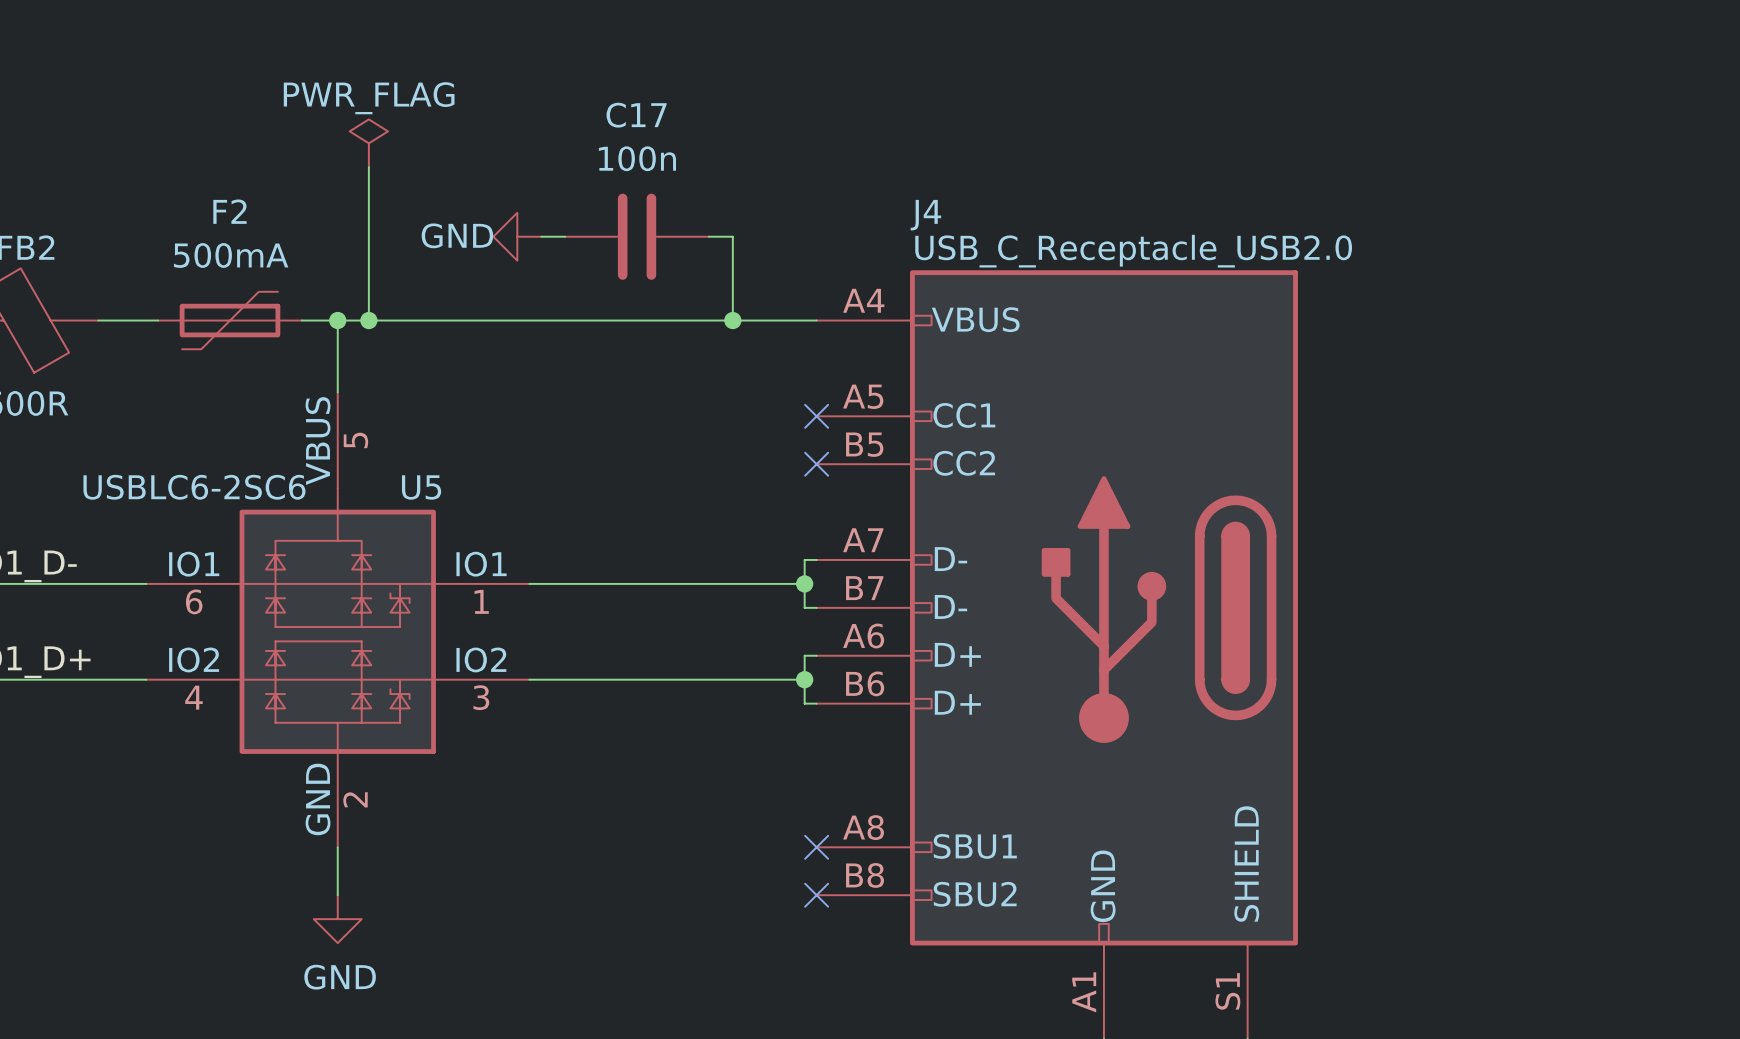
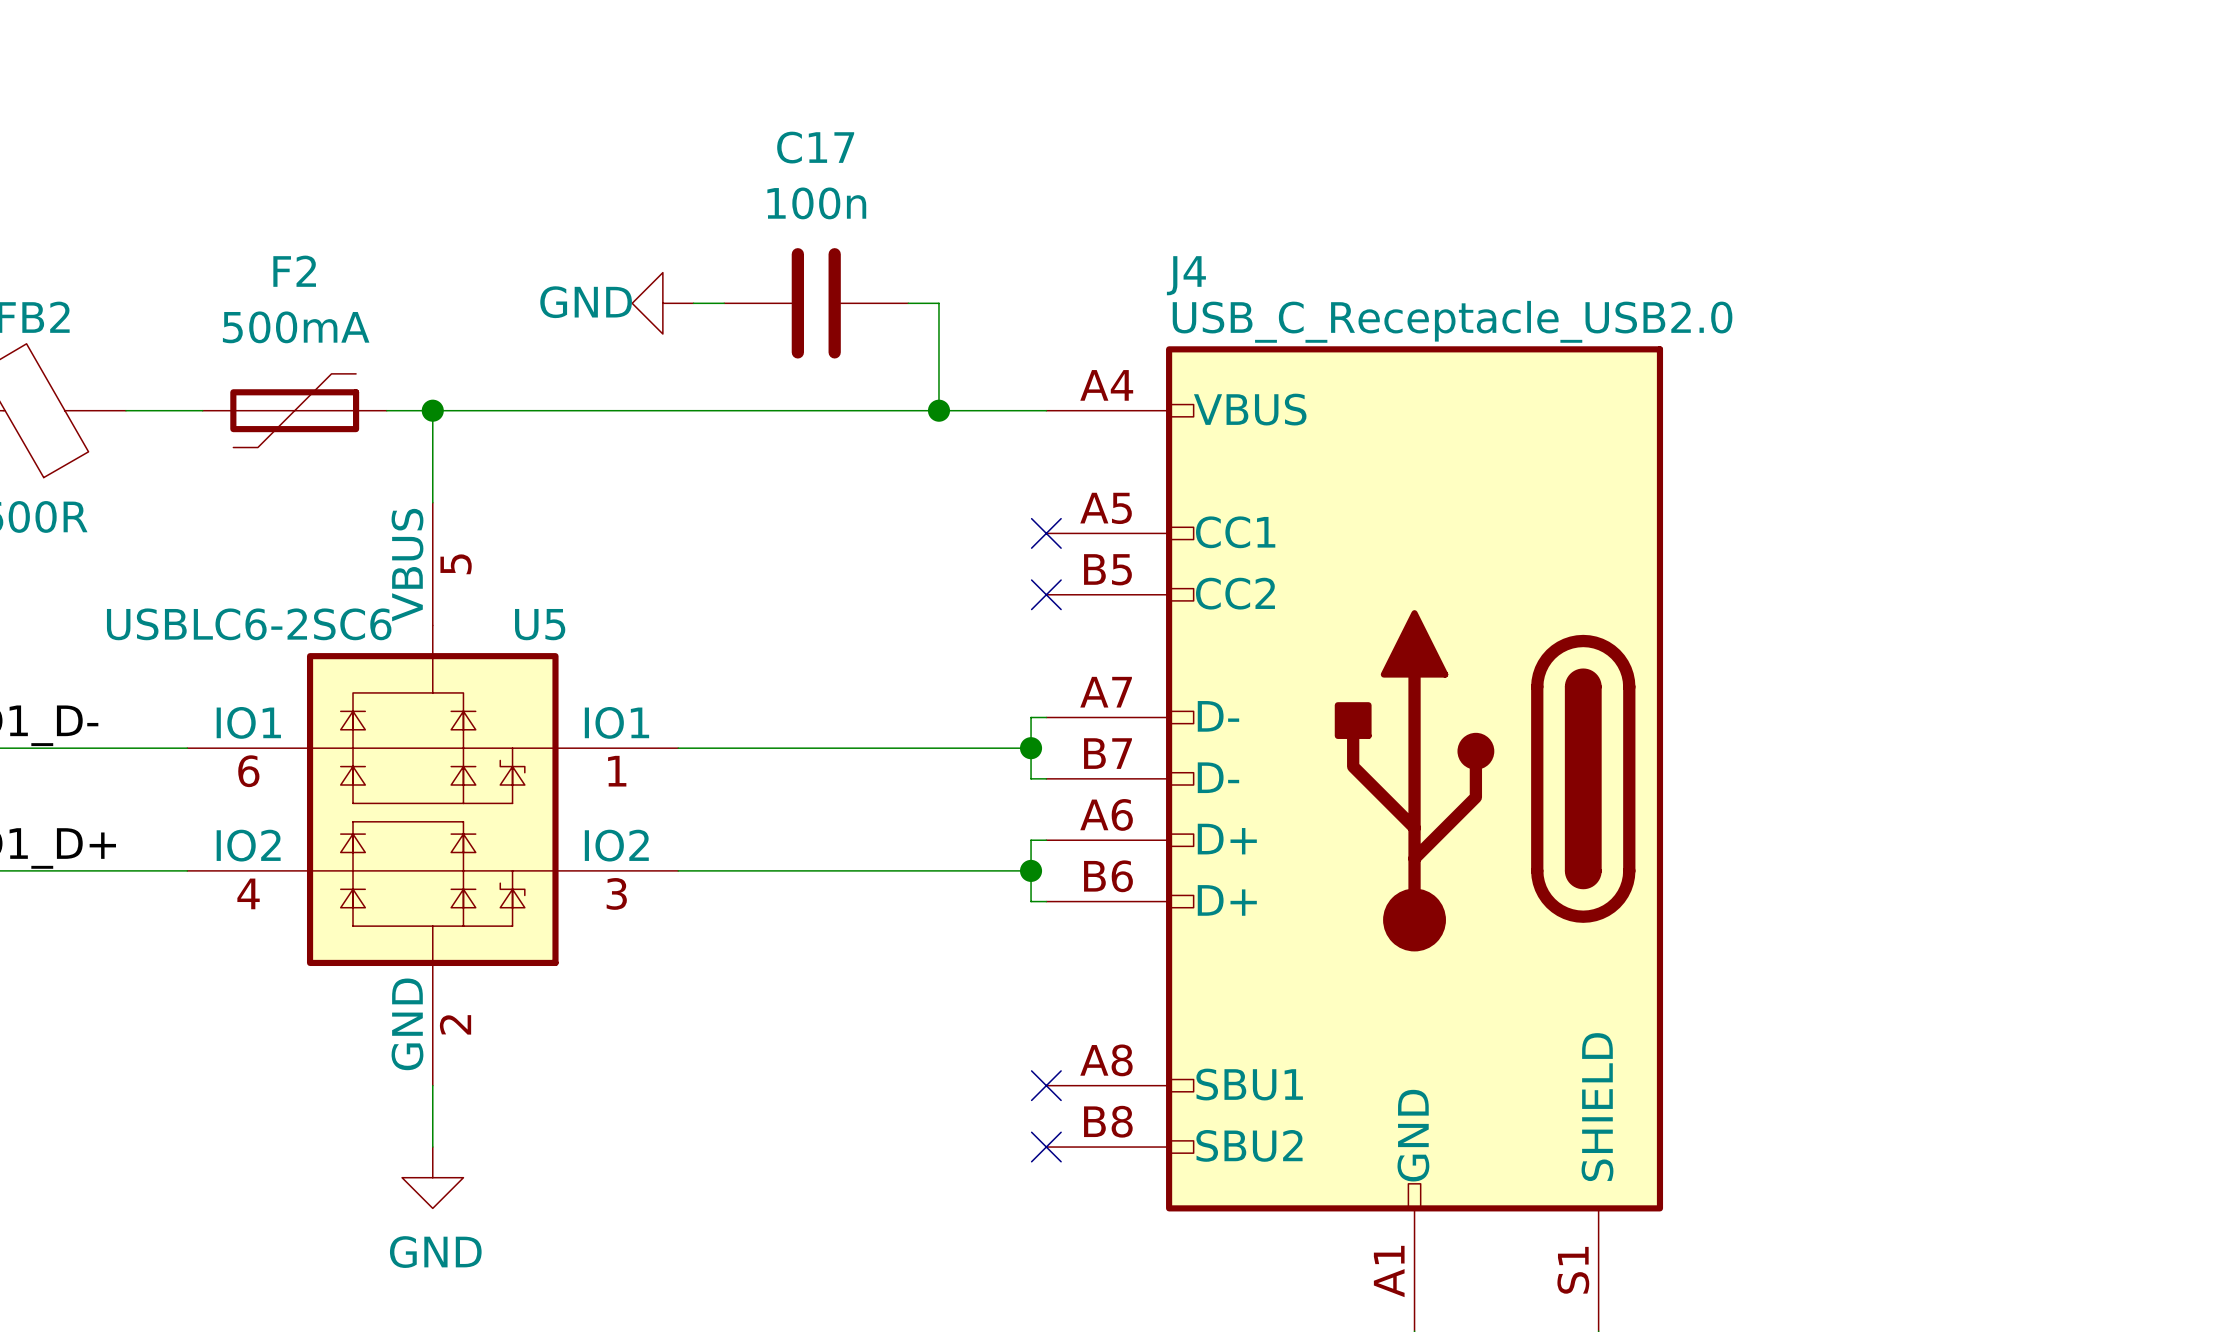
power symbol: PWR_FLAG (368, 143) -> none
wire: (368, 167) (368, 320) -> none
junction: (368, 320) -> none

